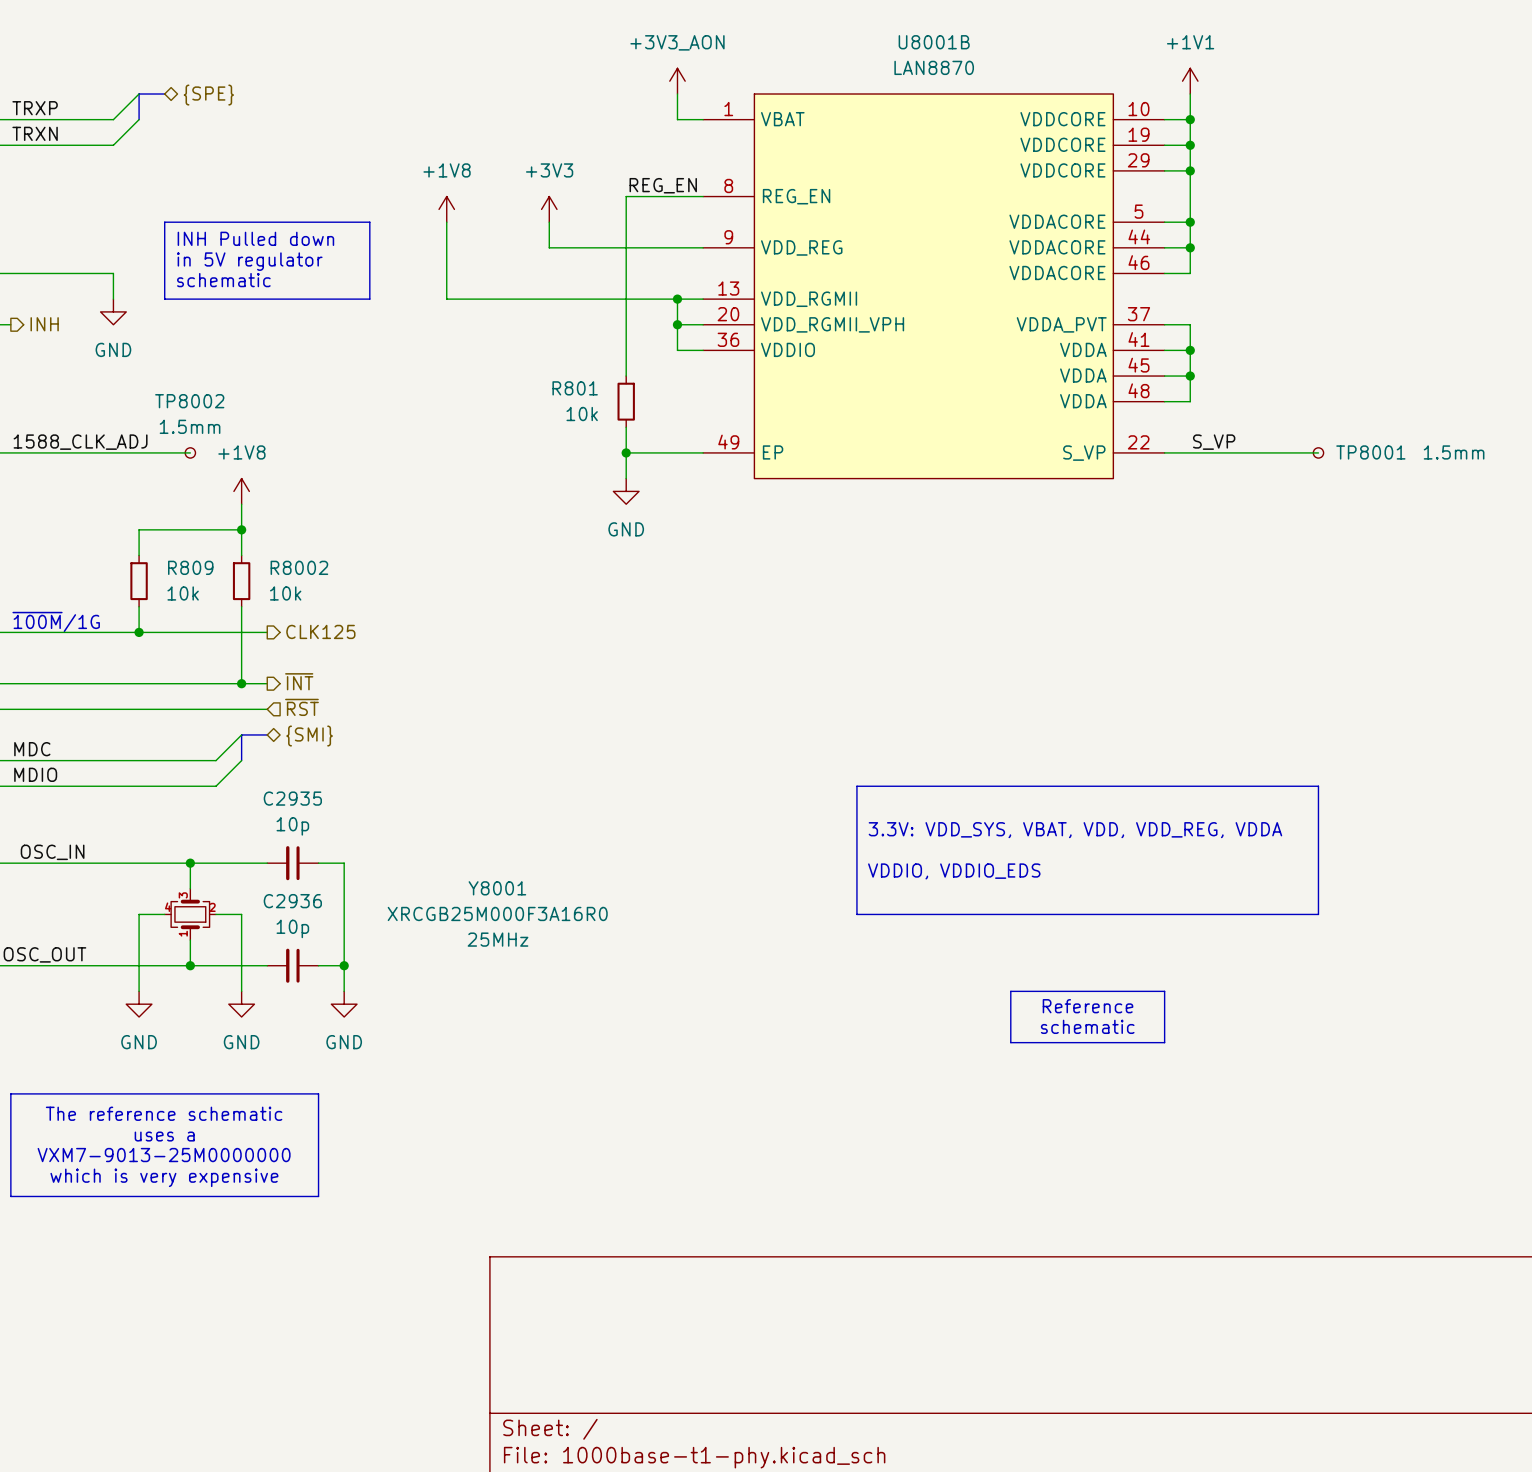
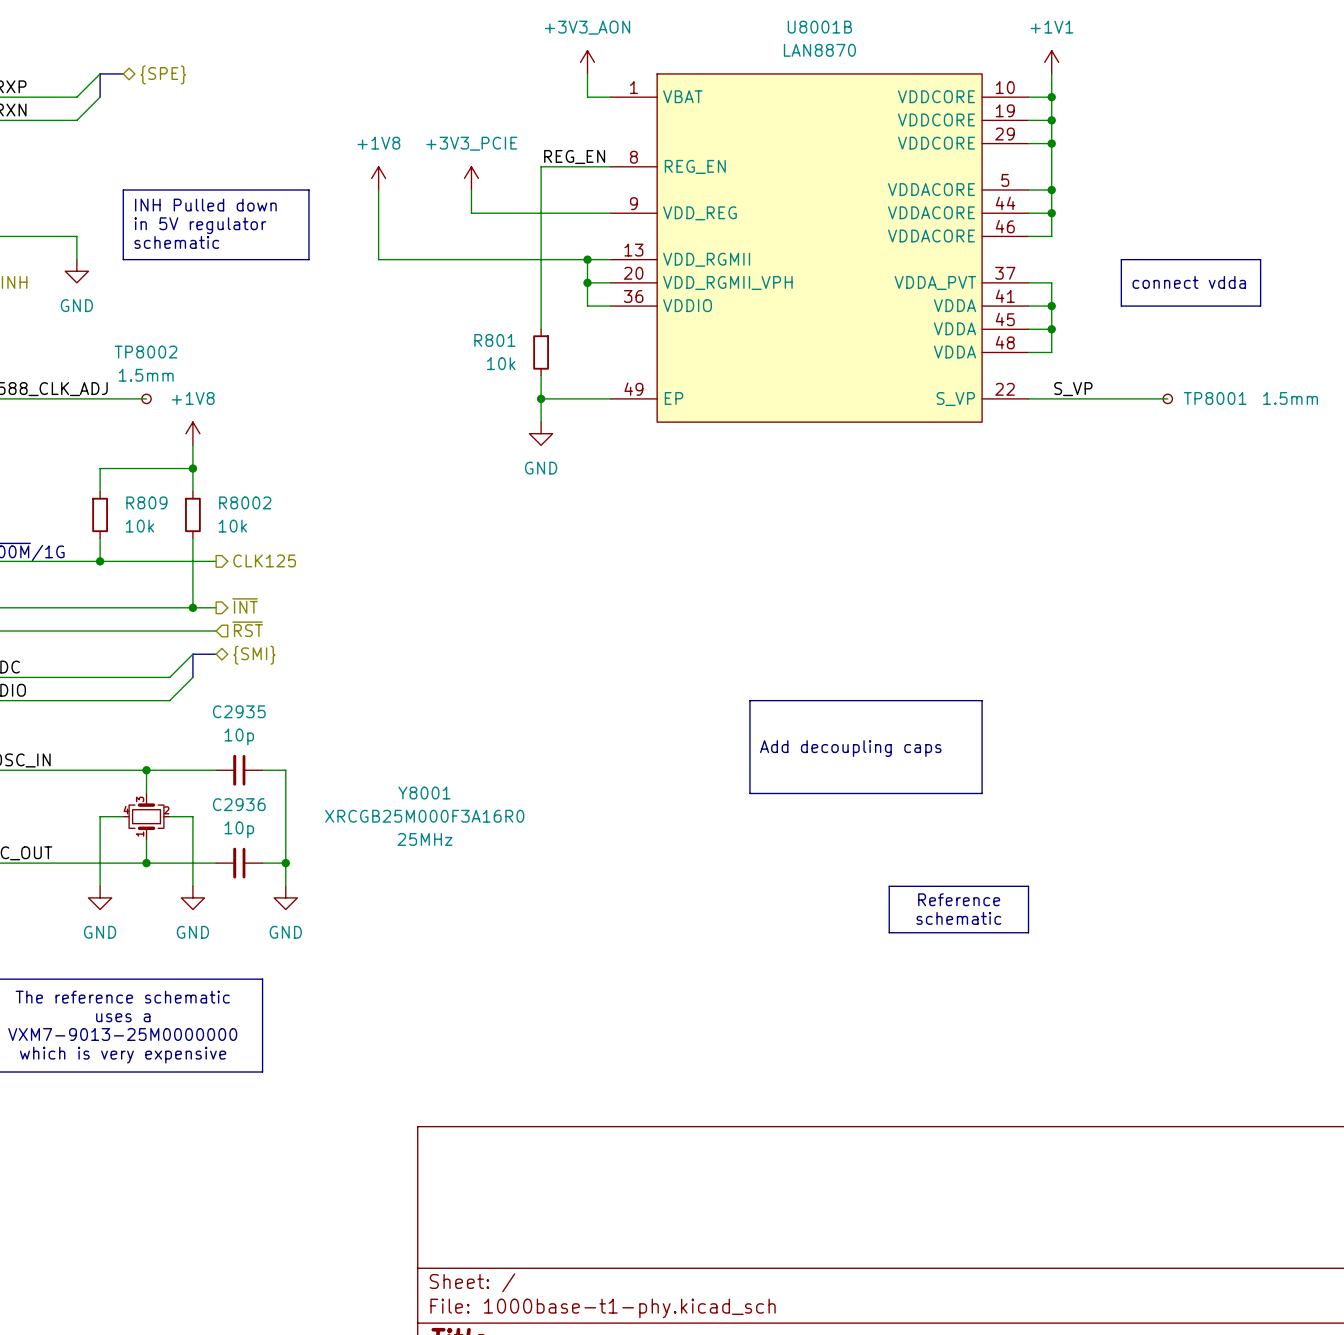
power symbol: +3V3 (549, 209) -> +3V3_PCIE (471, 178)
line: none -> (1121, 259) (1260, 259) (1260, 306) (1121, 306) (1121, 259)
text: none -> connect vdda (1189, 282)
line: (1113, 786) (1318, 786) (1318, 914) (856, 914) (856, 888) -> (982, 700) (982, 793) (749, 793)
text: 3.3V: VDD_SYS, VBAT, VDD, VDD_REG, VDDA (1075, 830) -> Add decoupling caps (850, 748)
text: VDDIO, VDDIO_EDS (954, 871) -> none

